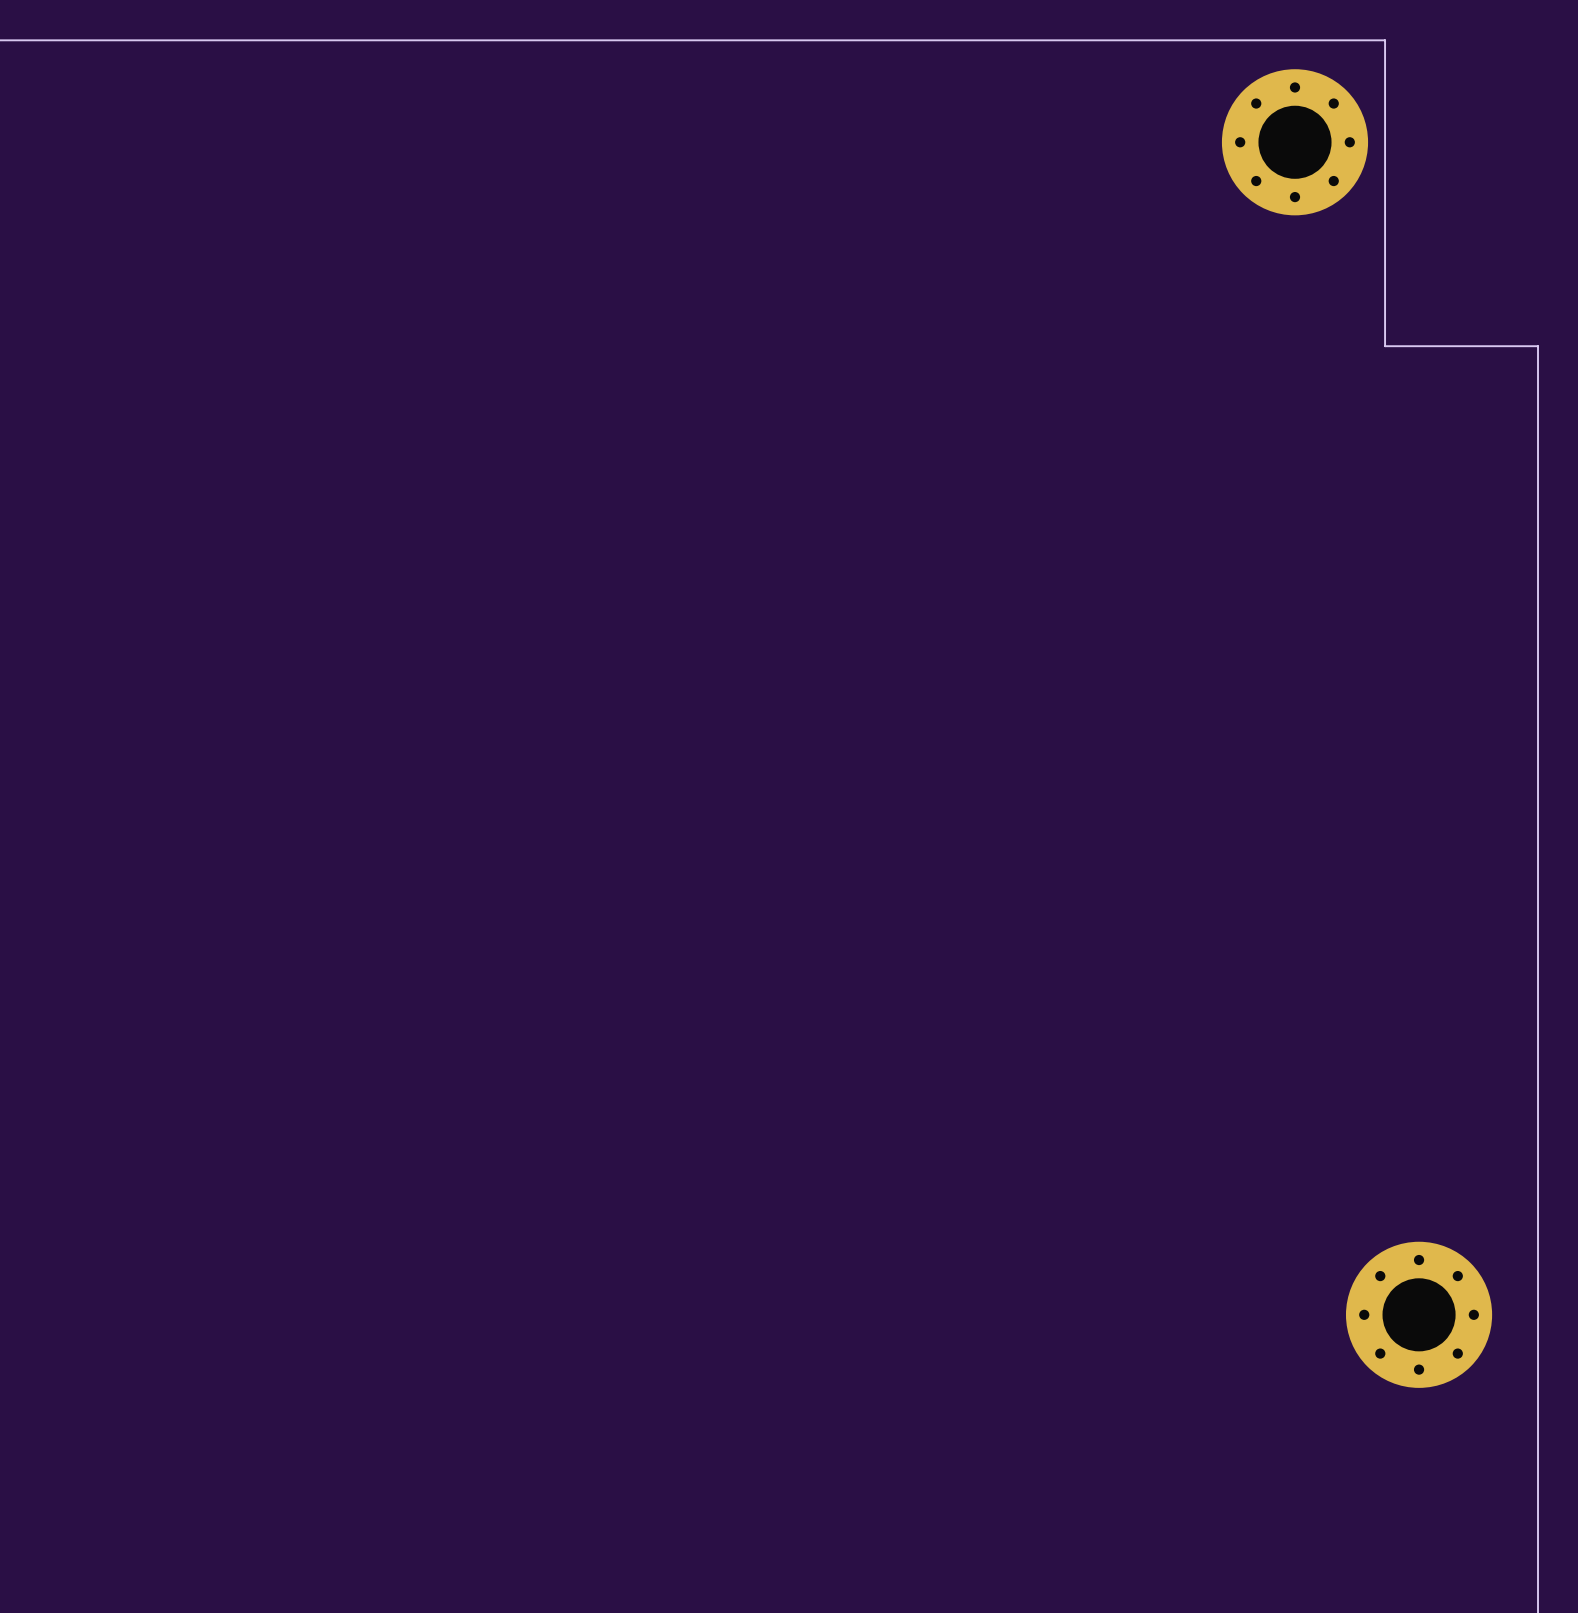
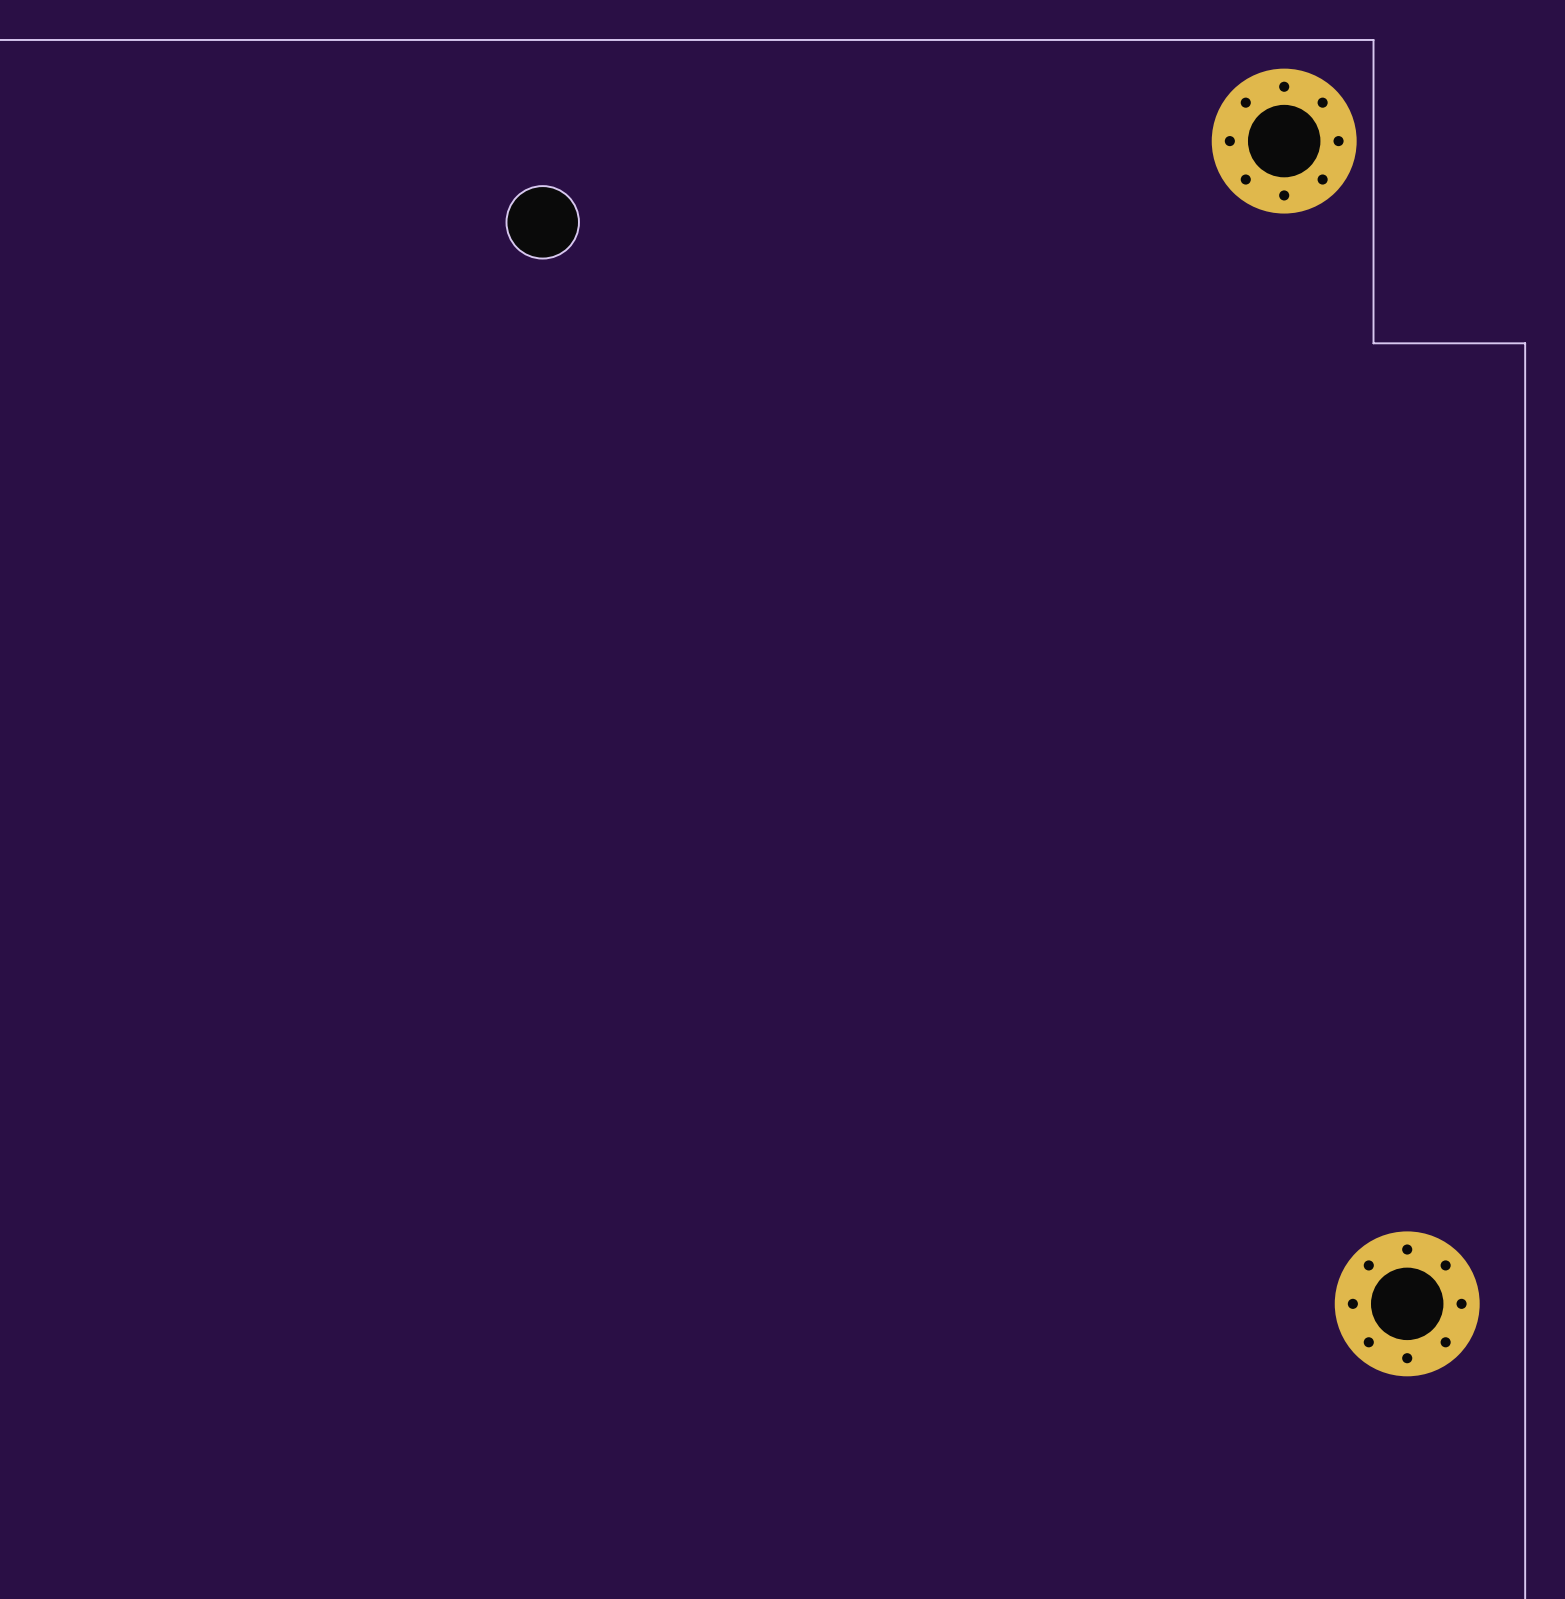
part: none -> (542, 222)

